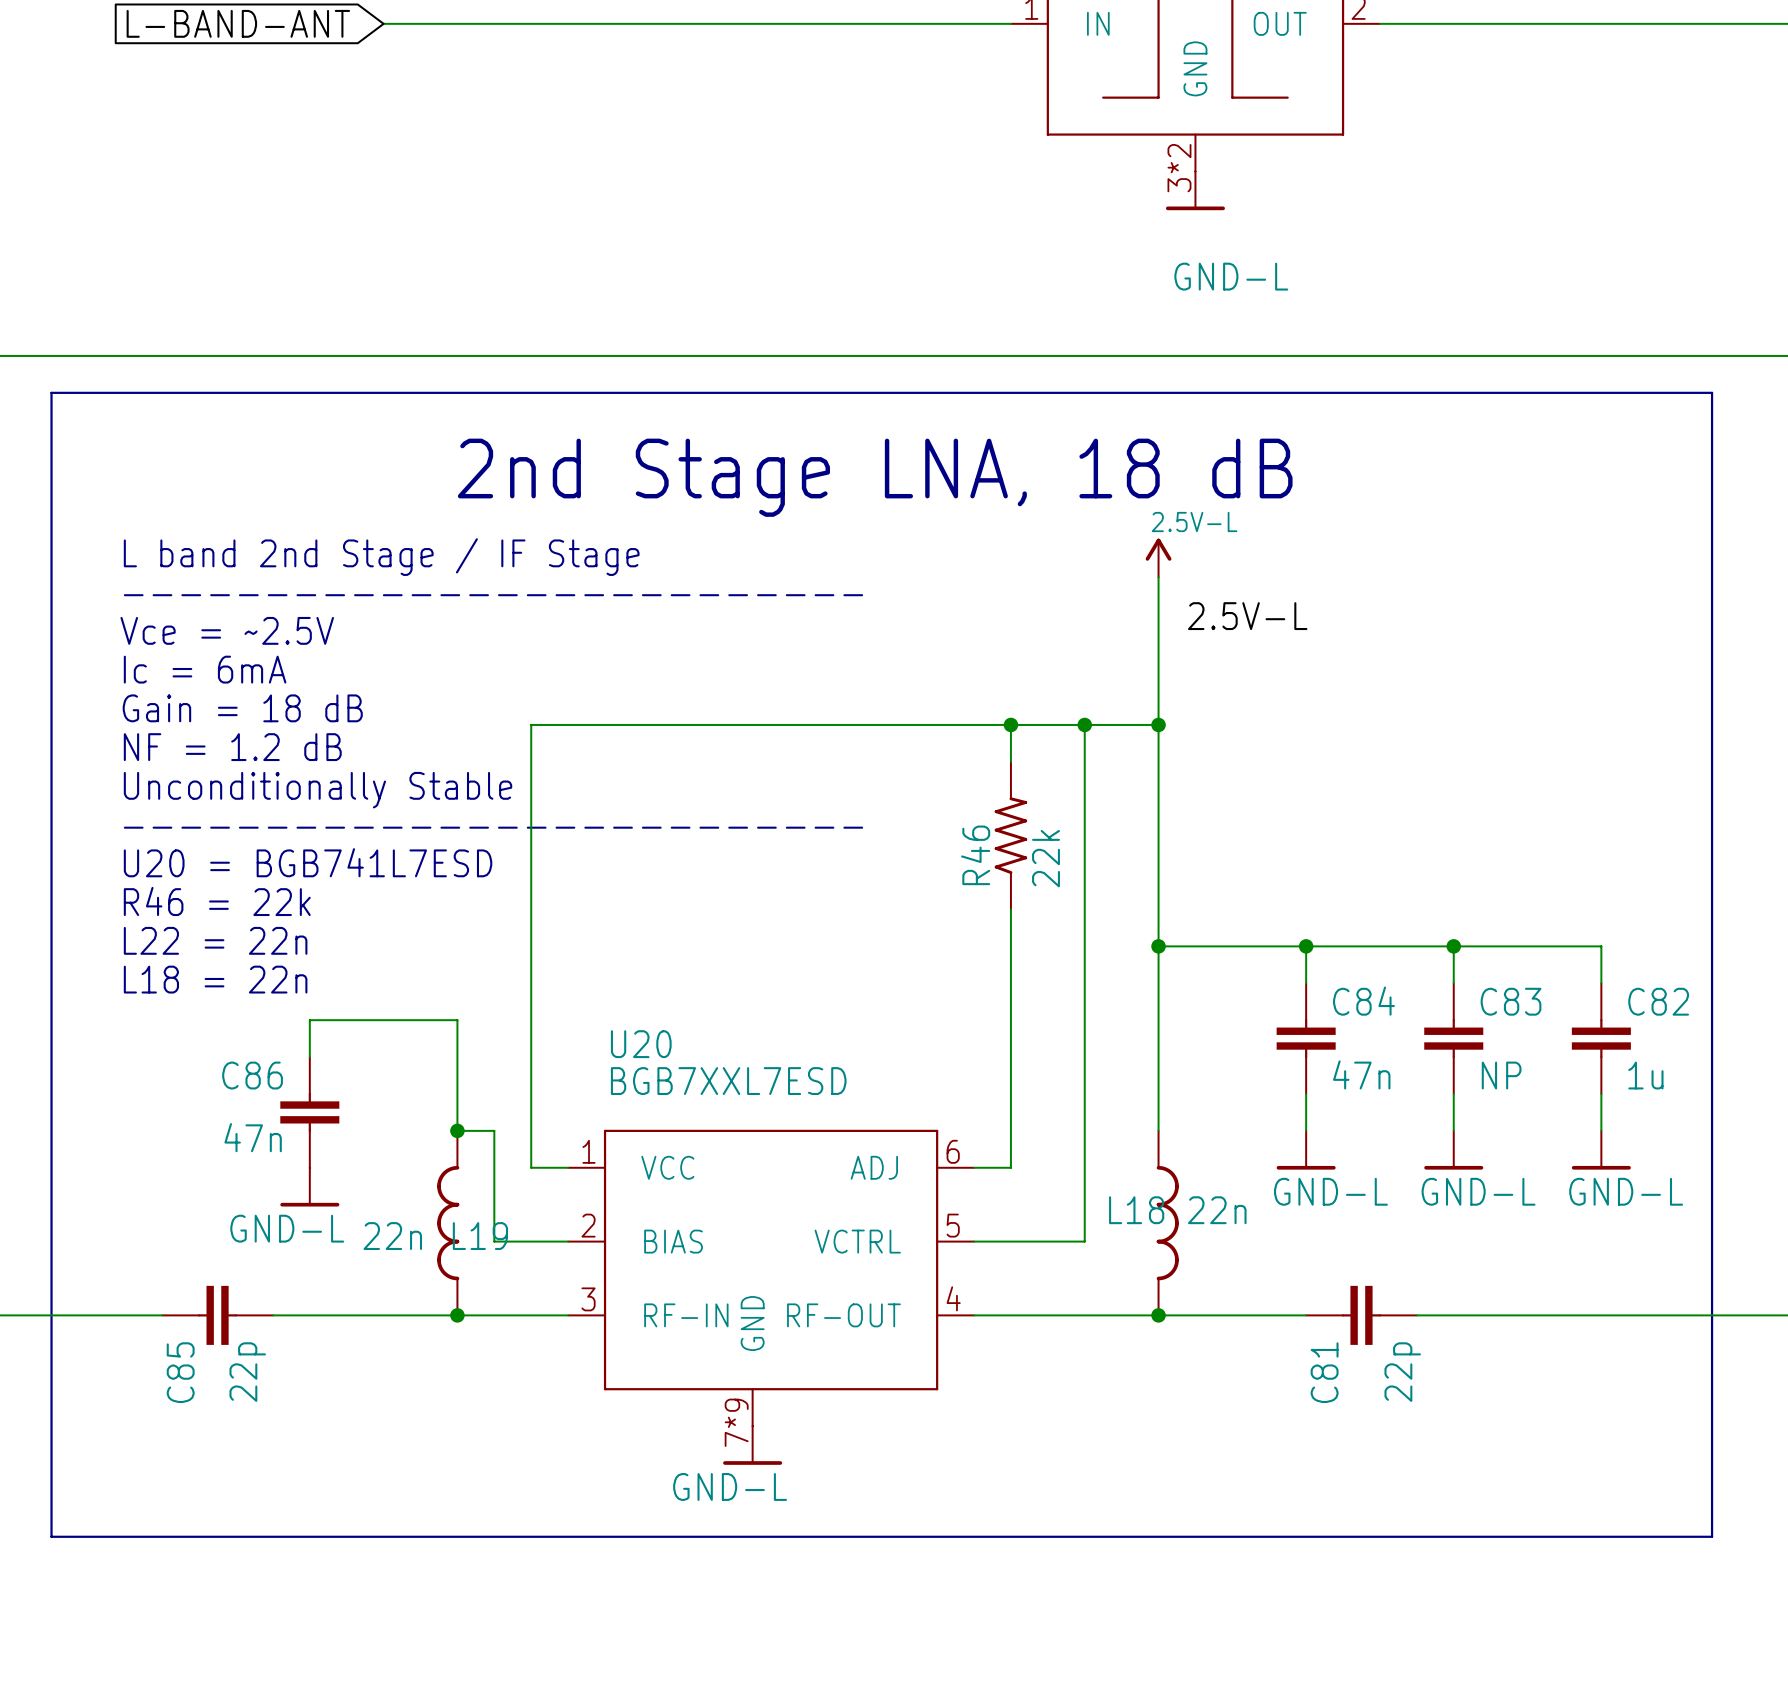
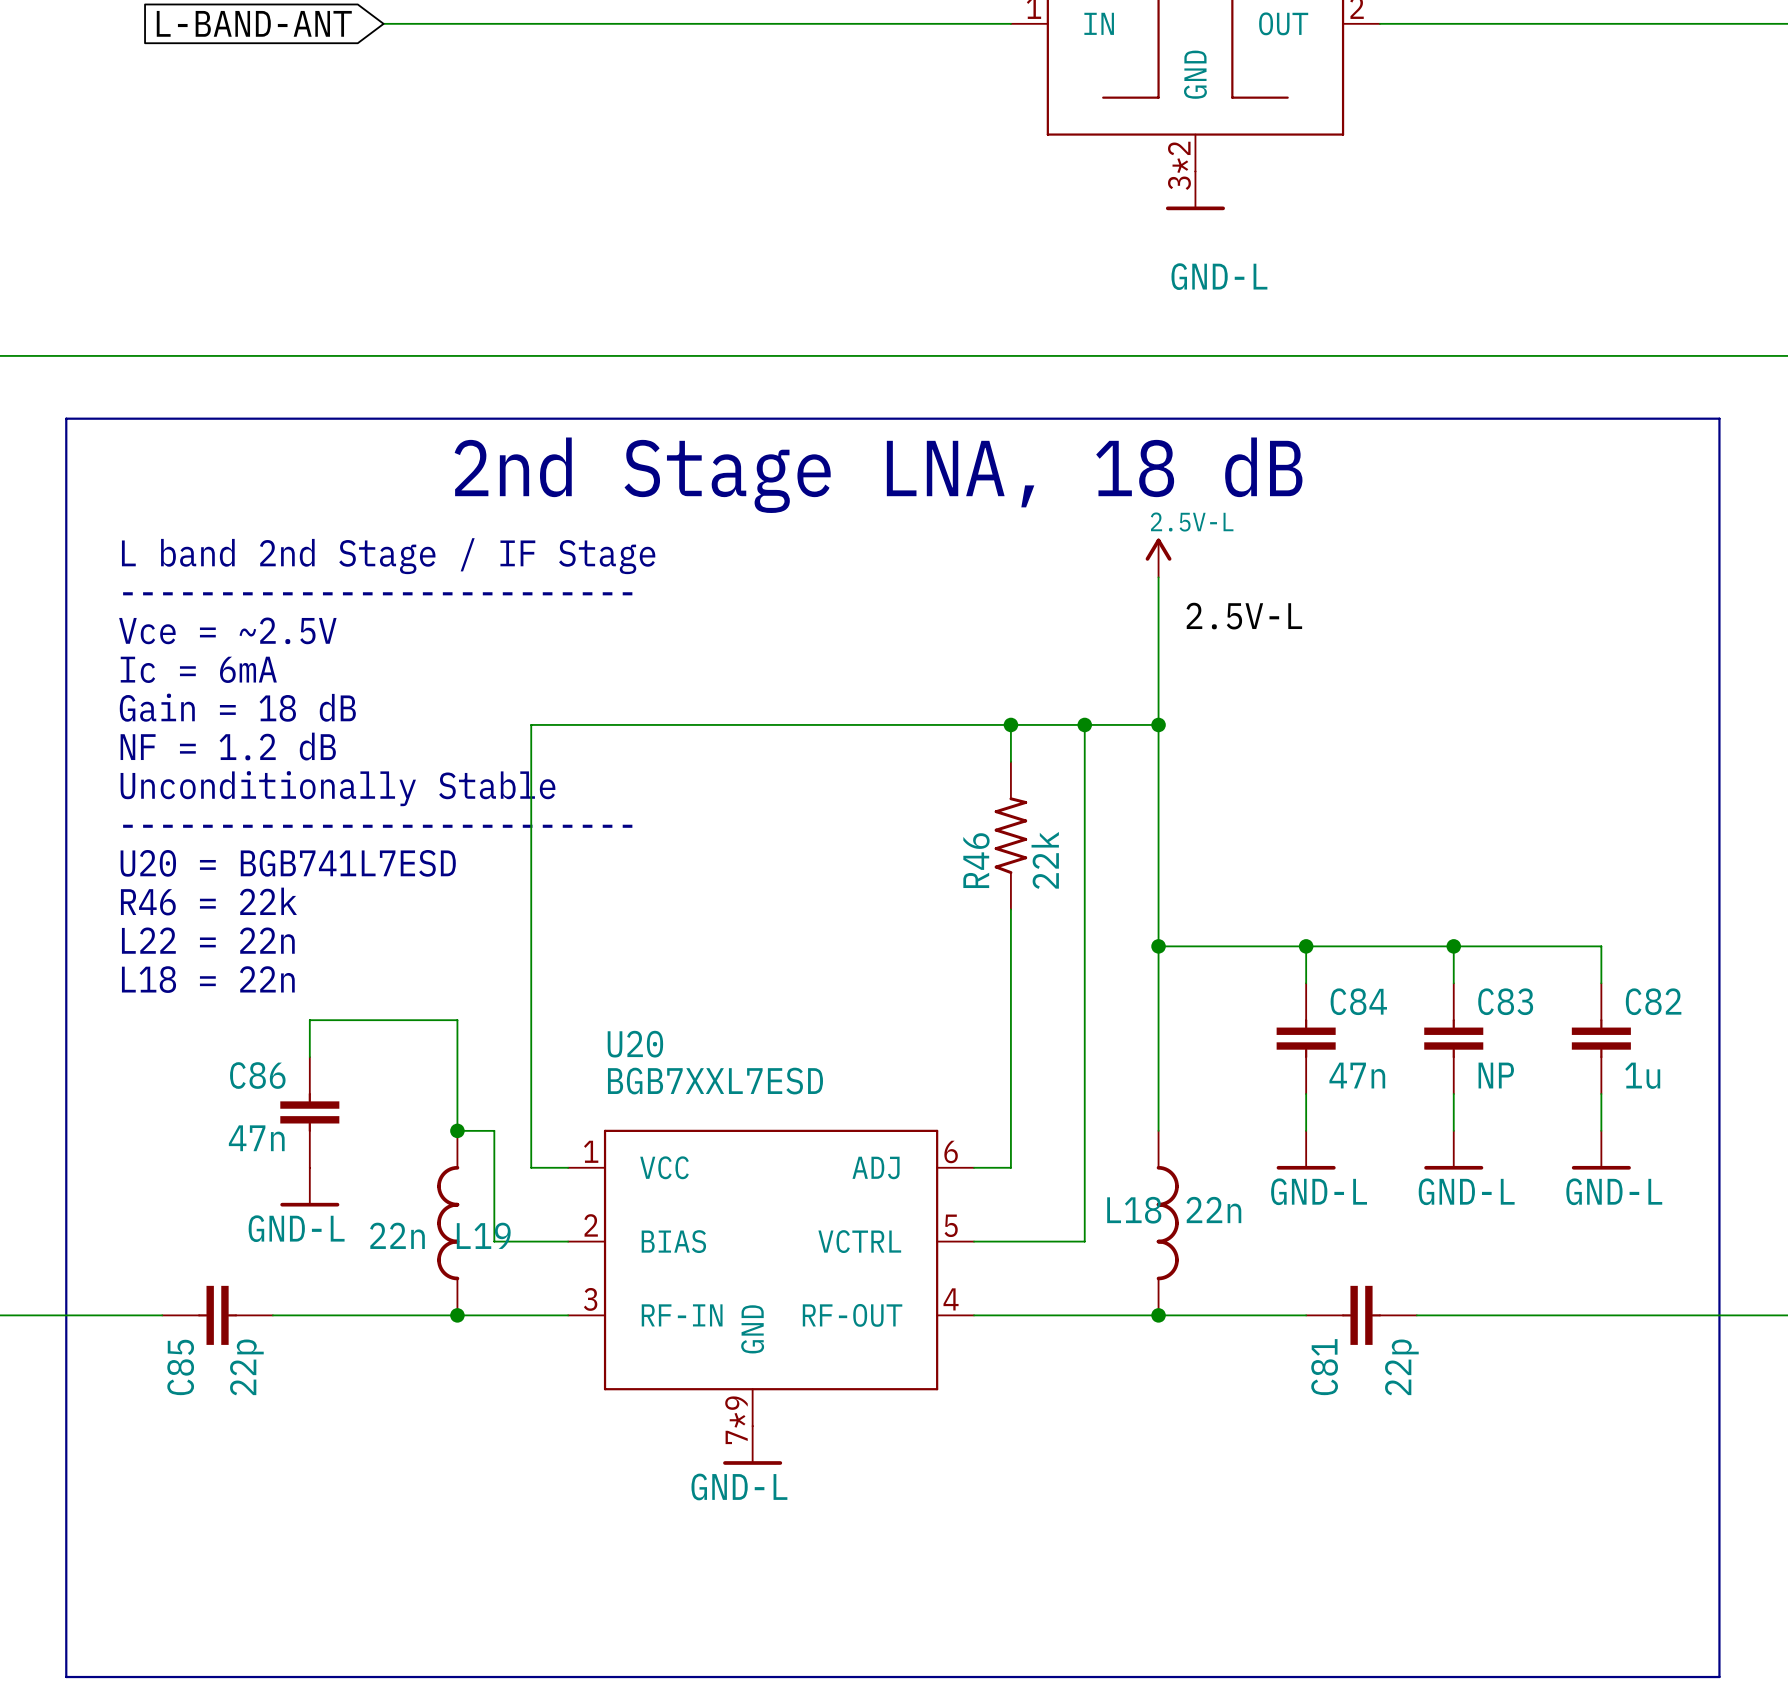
line: (51, 392) (51, 1536) (1712, 1536) (1712, 392) (51, 392) -> (66, 418) (66, 1677) (1719, 1677) (1719, 418) (66, 418)

